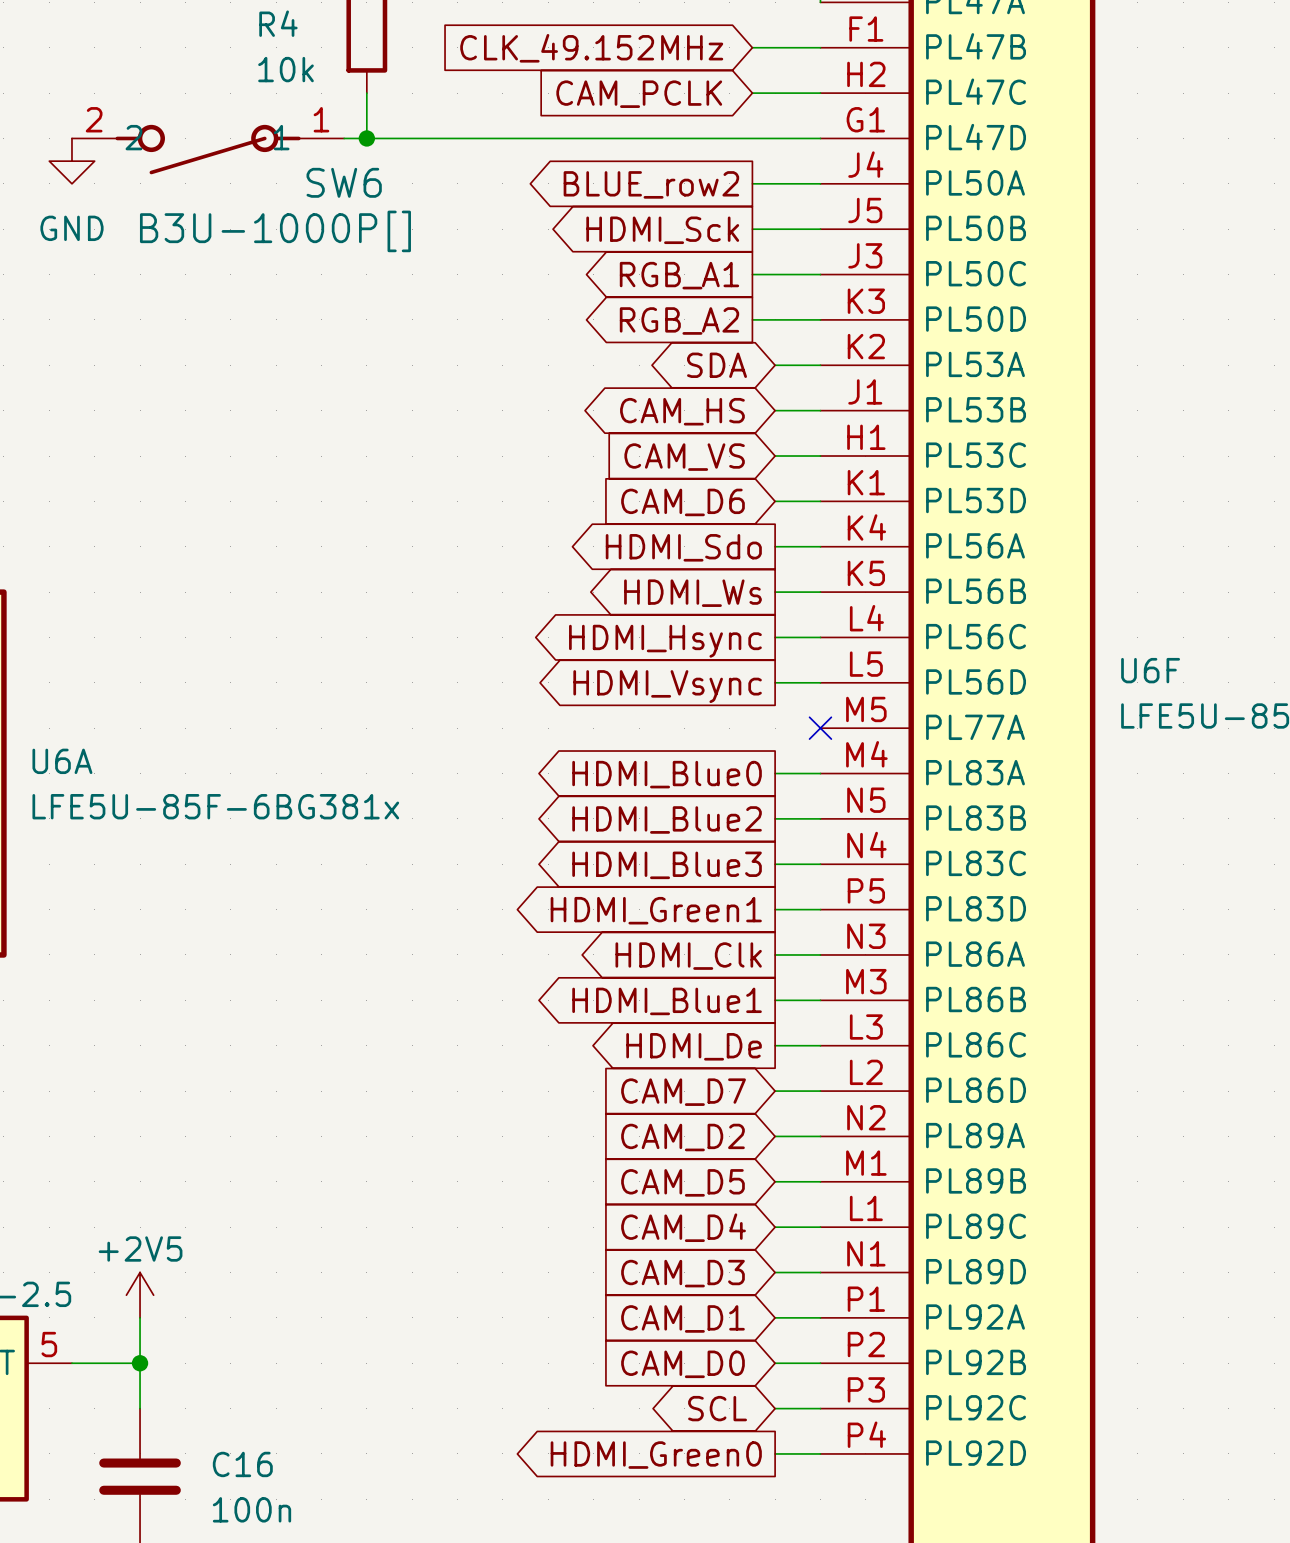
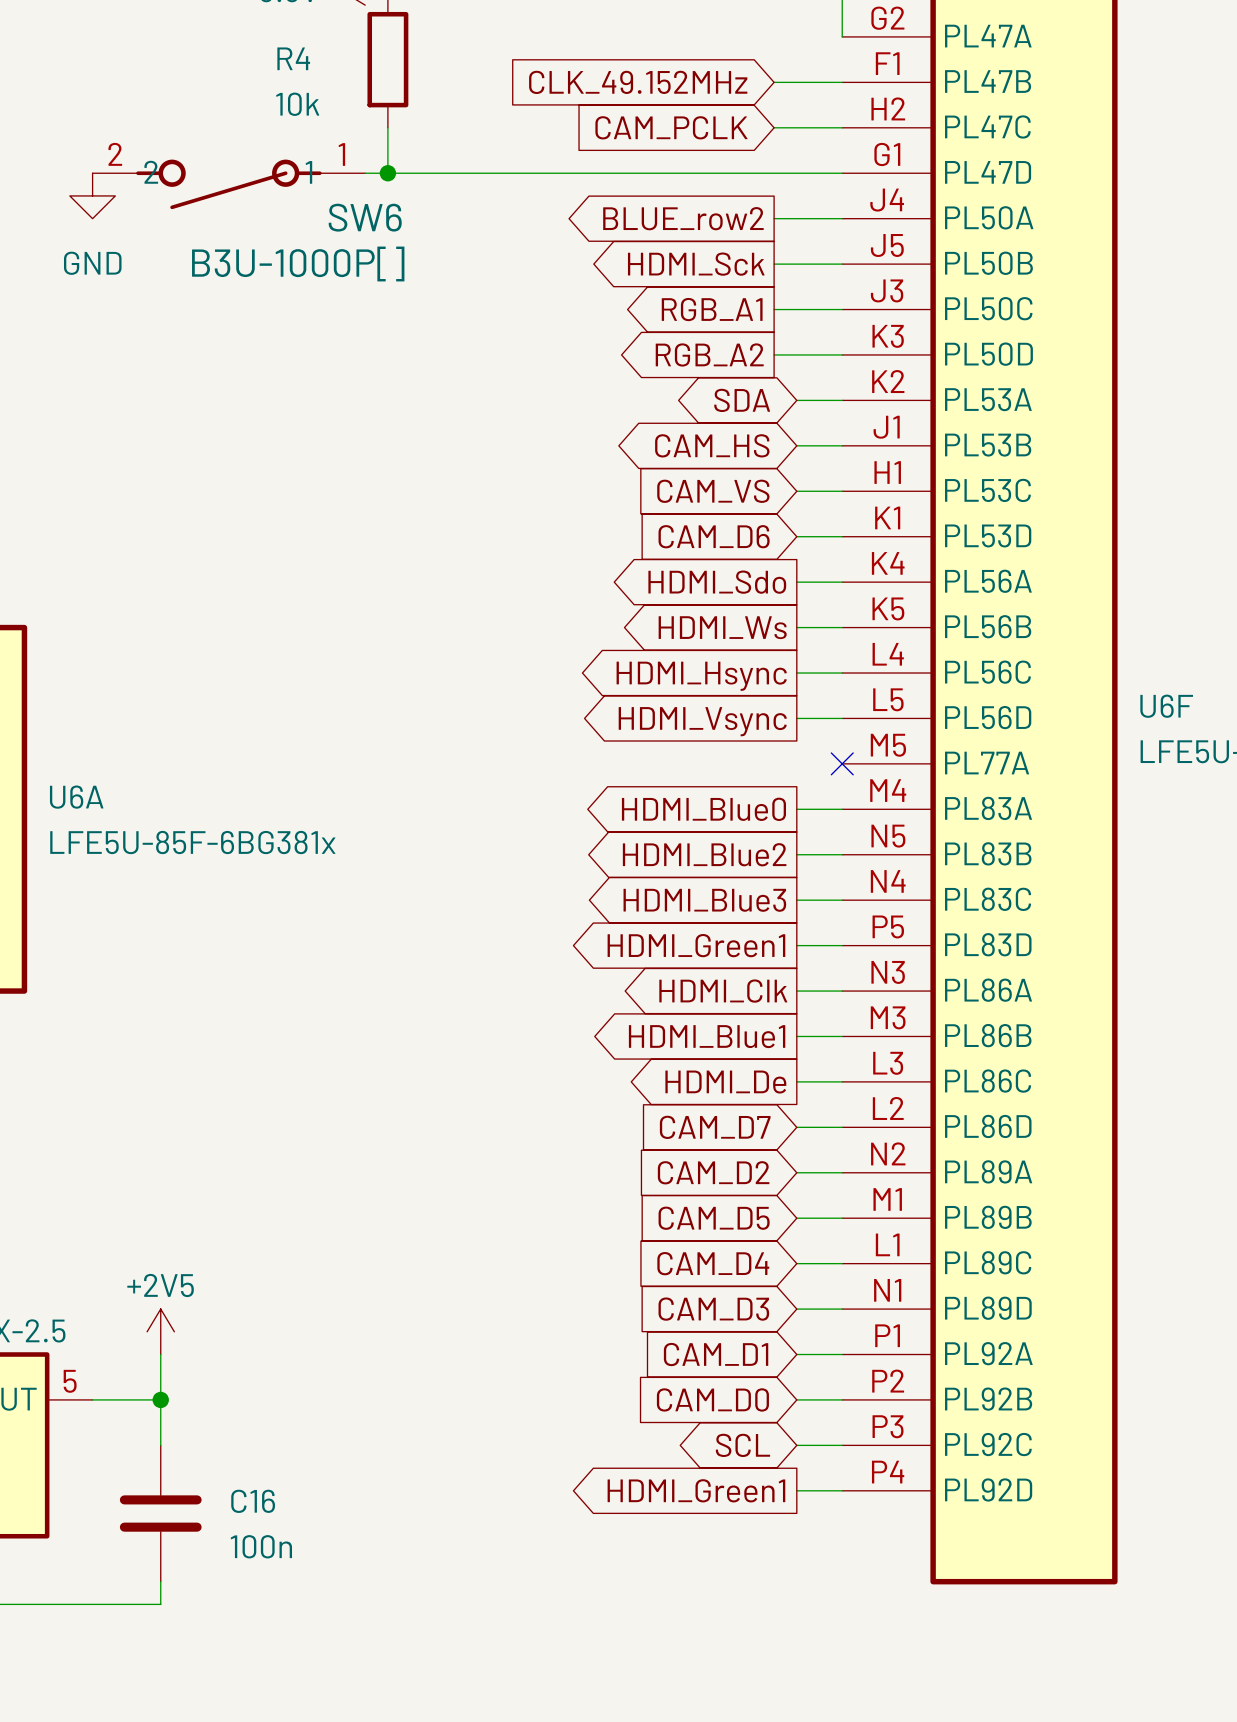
global label: HDMI_Green0 (656, 1455) -> HDMI_Green1 (696, 1490)

